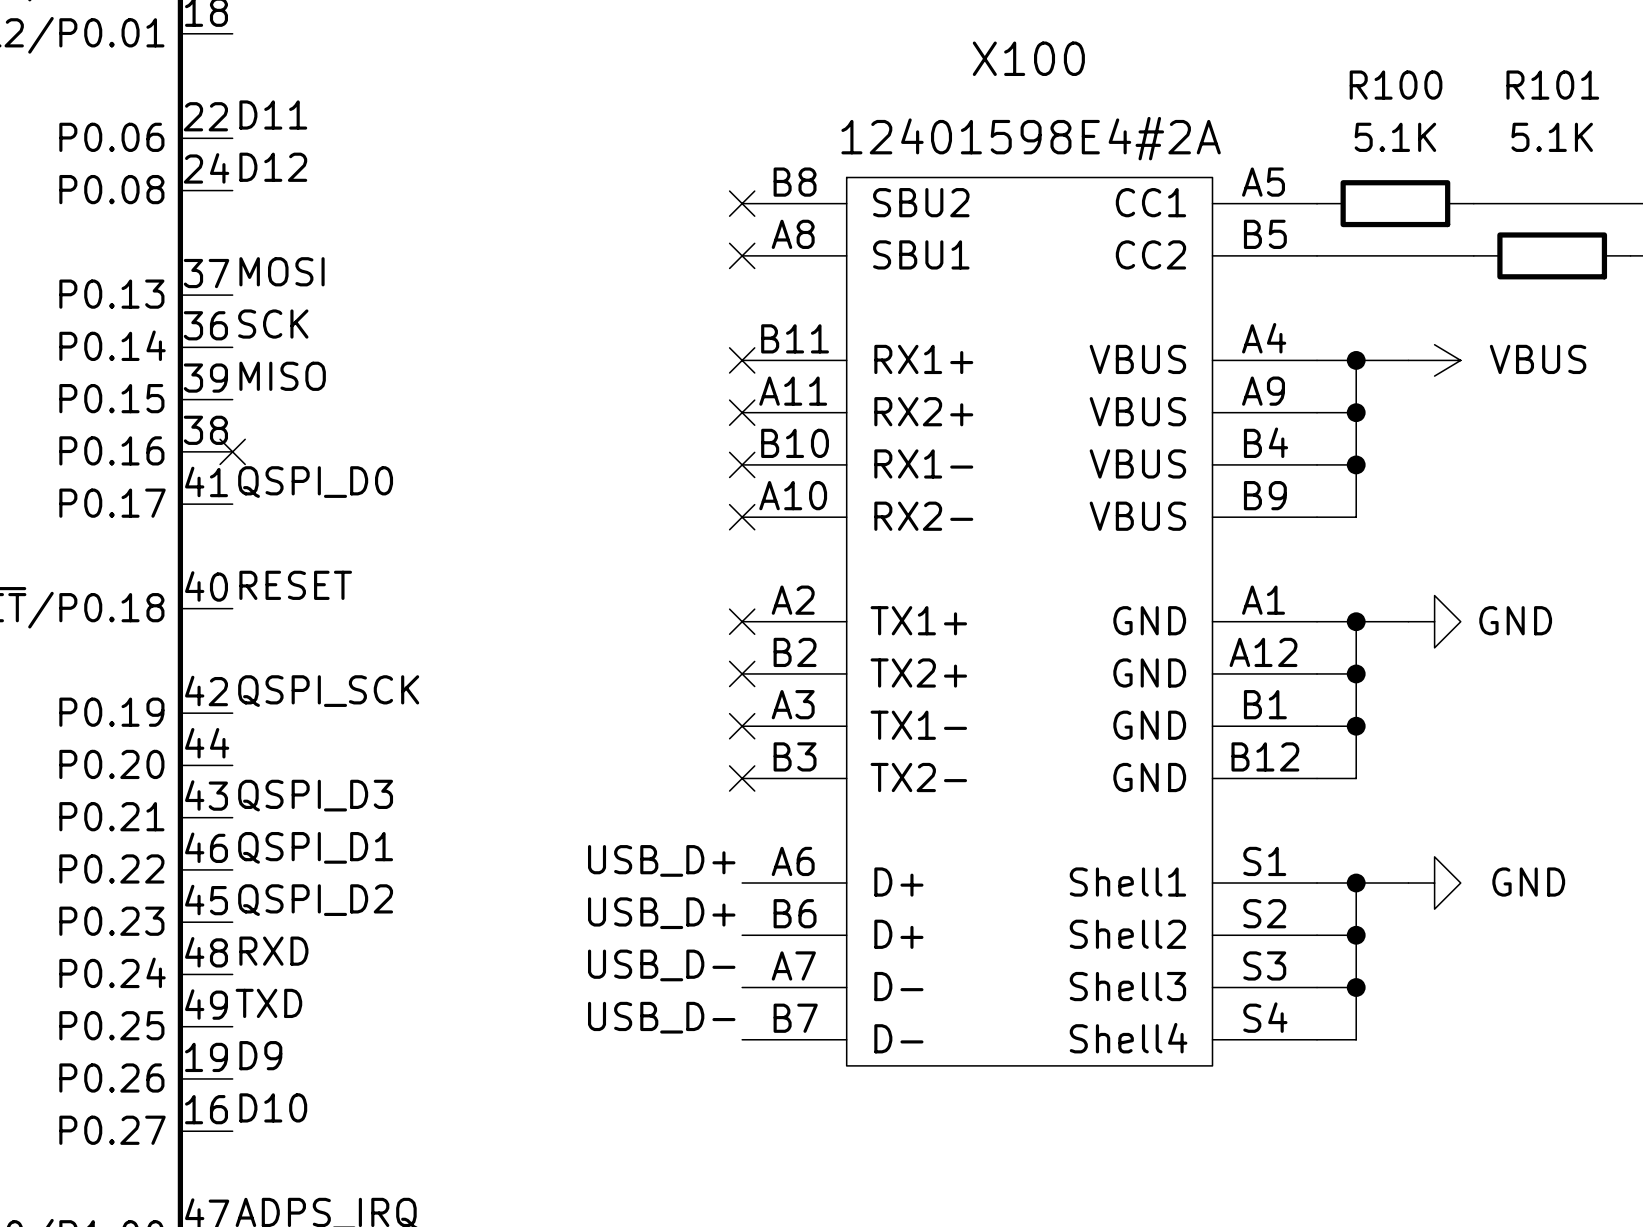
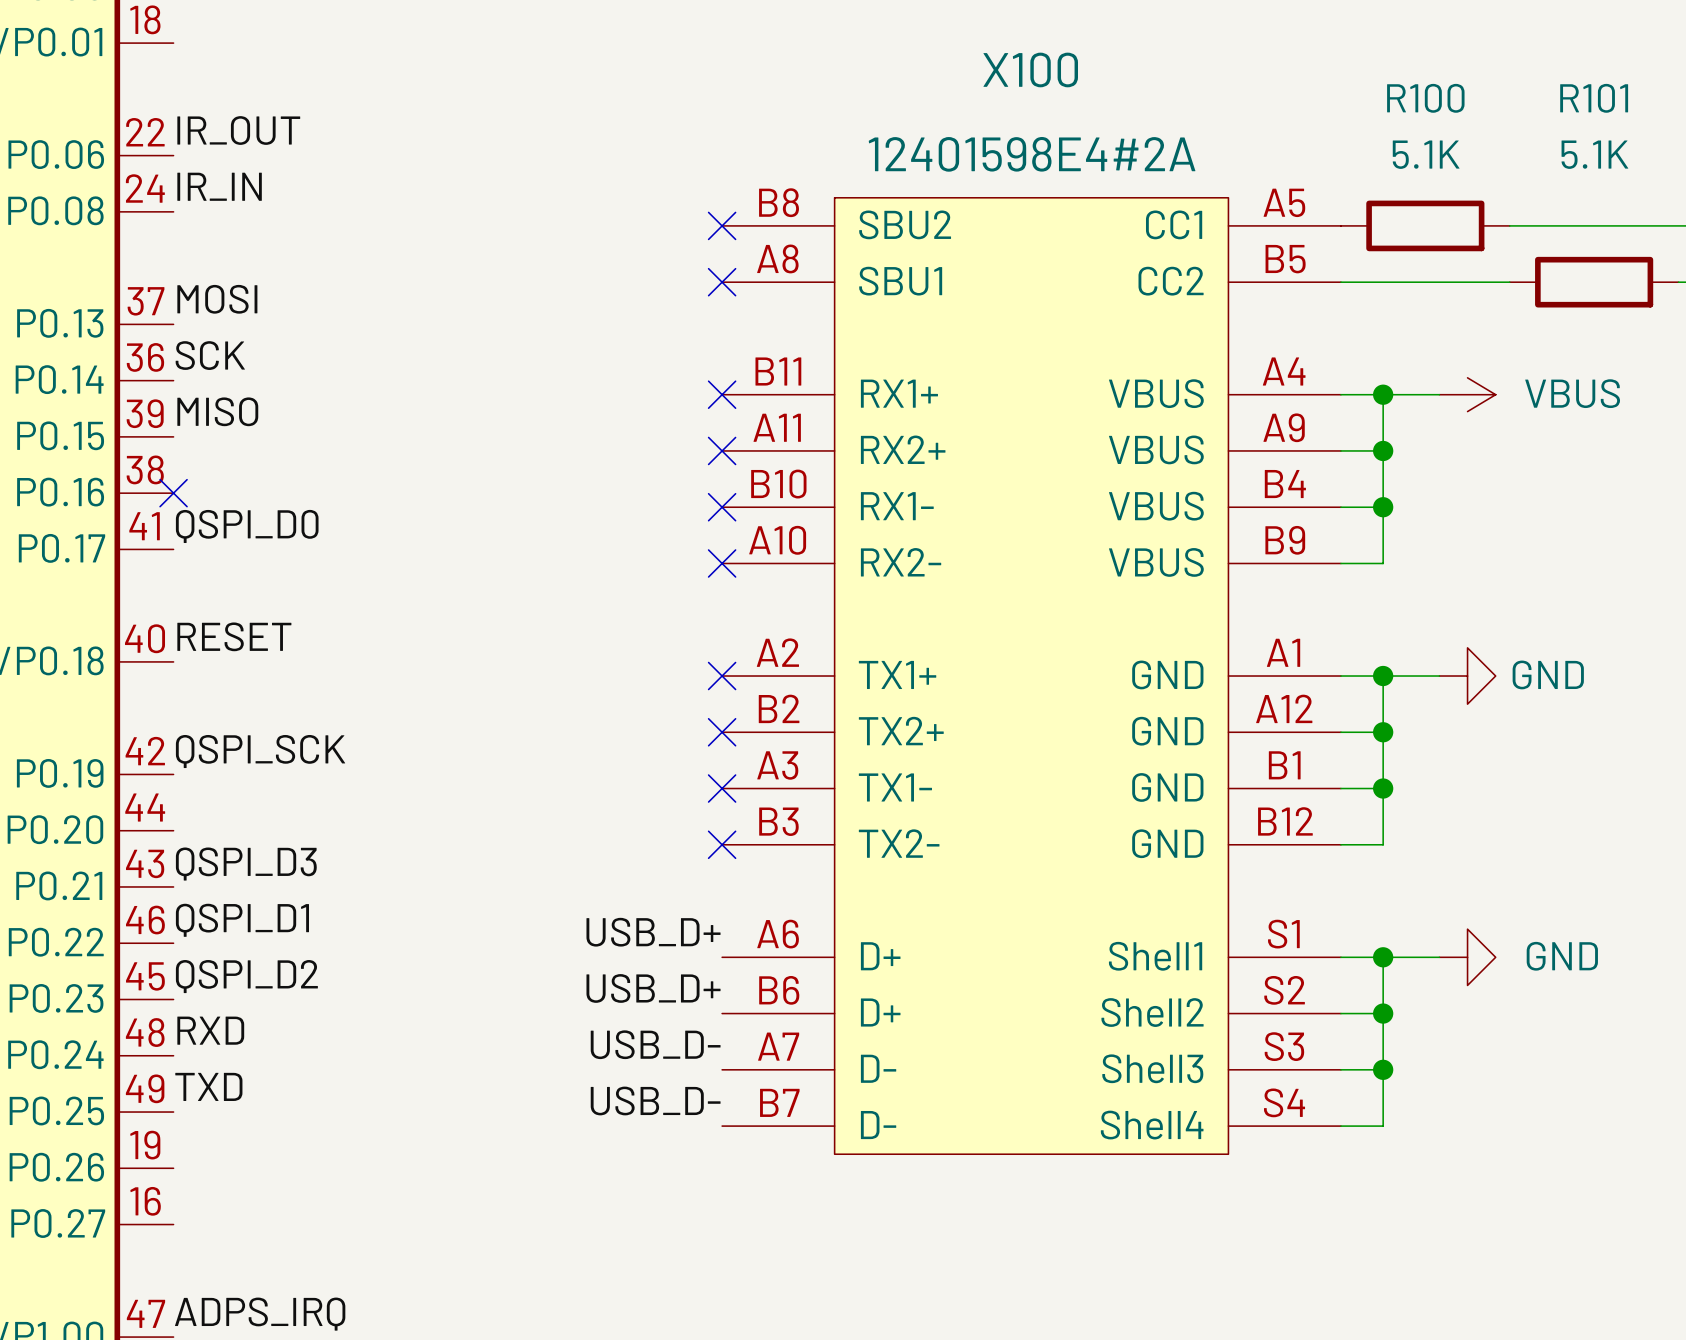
label: D11 (273, 115) -> IR_OUT (238, 130)
label: D12 (273, 167) -> IR_IN (219, 186)
label: D9 (260, 1055) -> none
label: D10 (273, 1107) -> none

